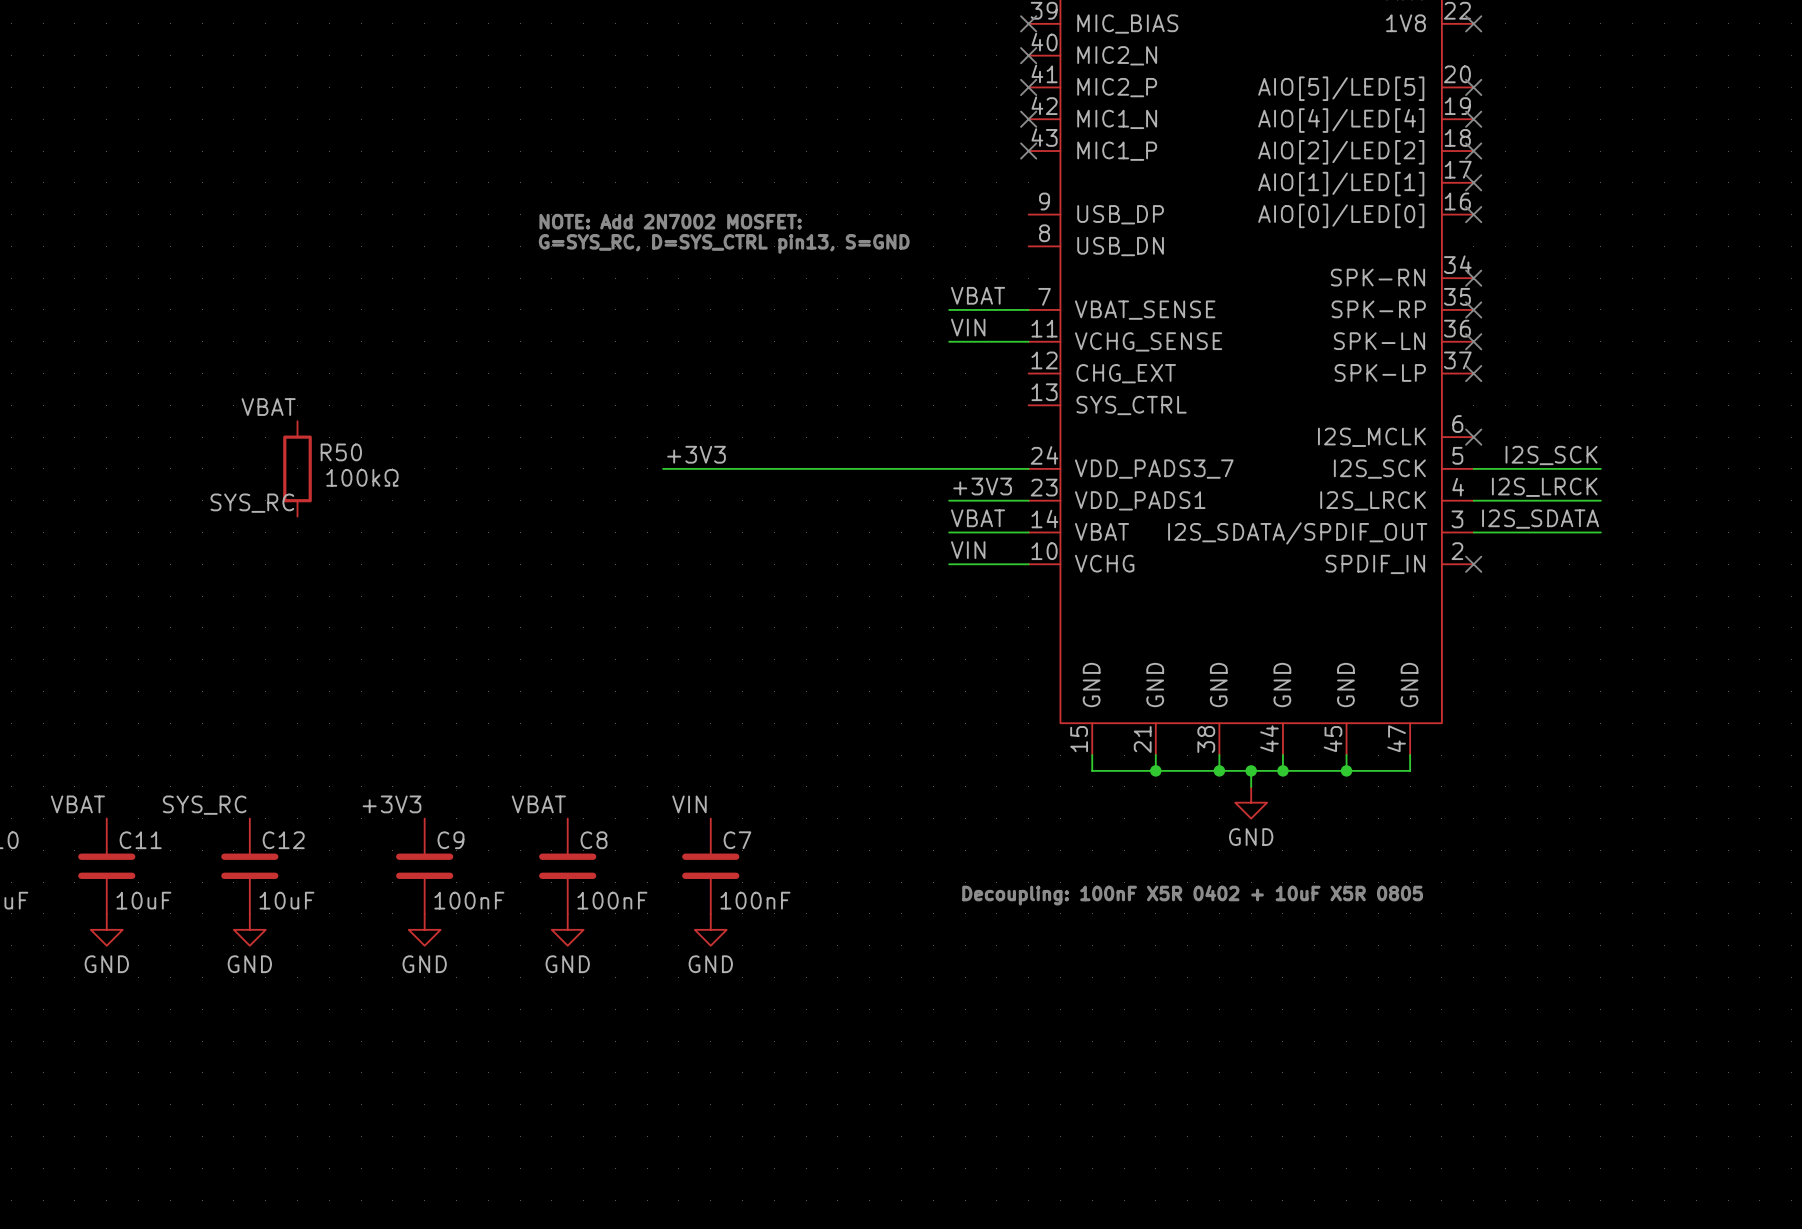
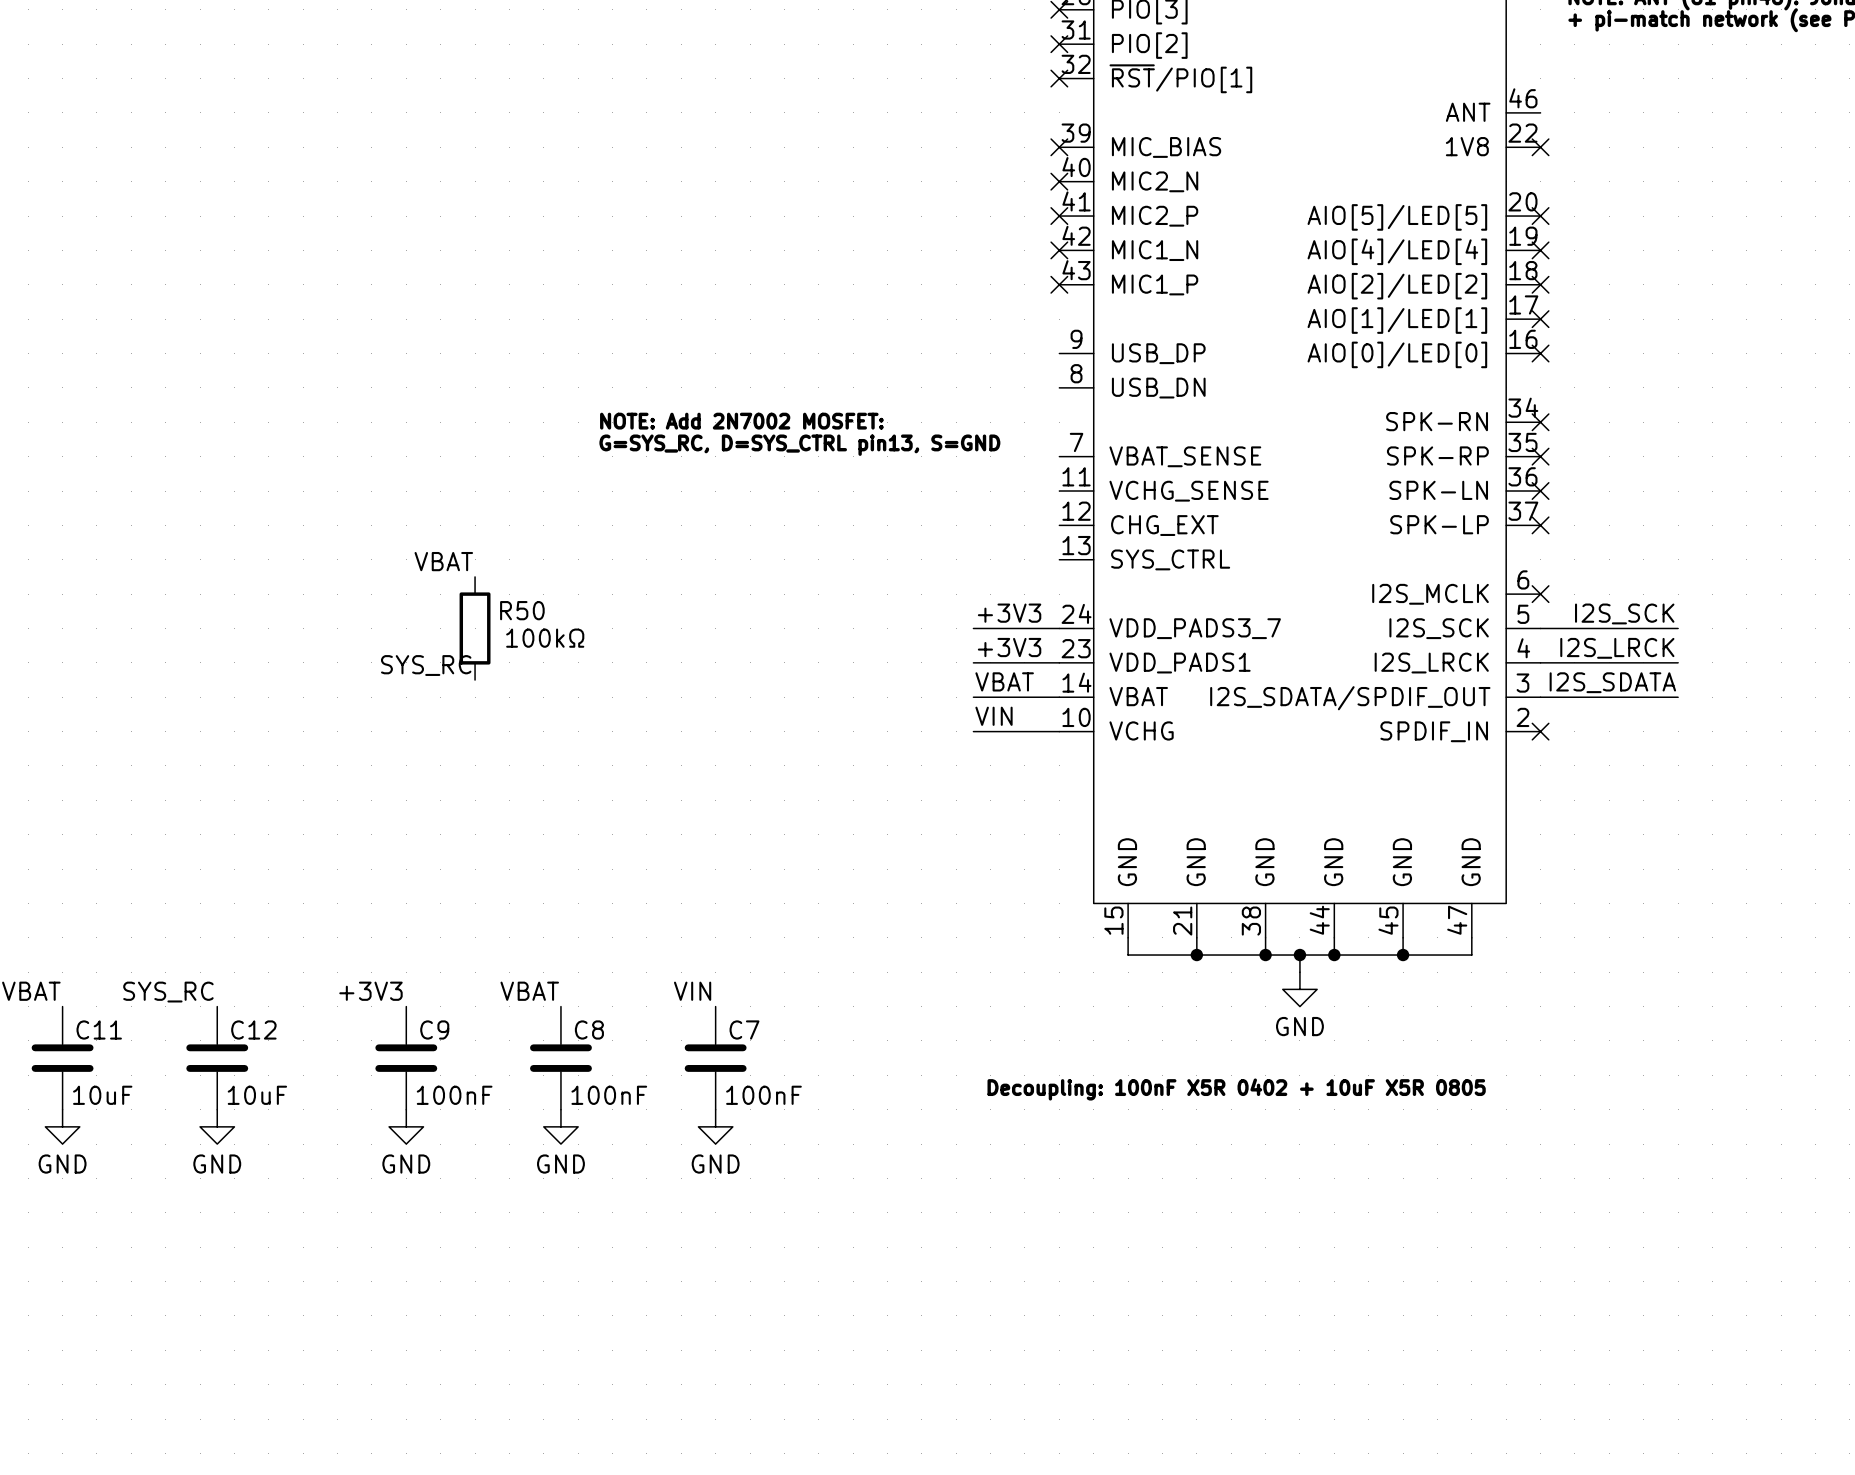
text position: NOTE: Add 2N7002 MOSFET: (670, 221) -> NOTE: Add 2N7002 MOSFET: (741, 421)
text position: G=SYS_RC, D=SYS_CTRL pin13, S=GND (724, 243) -> G=SYS_RC, D=SYS_CTRL pin13, S=GND (799, 445)
label: VBAT (978, 295) -> none
wire: (949, 309) (1028, 309) -> none
label: VIN (968, 327) -> none
wire: (949, 341) (1028, 341) -> none
label position: VBAT (268, 407) -> VBAT (443, 561)
label position: +3V3 (696, 454) -> +3V3 (1009, 613)
R50 position: (297, 468) -> (475, 628)
wire: (663, 468) (949, 468) -> none
label position: SYS_RC (252, 503) -> SYS_RC (426, 665)

